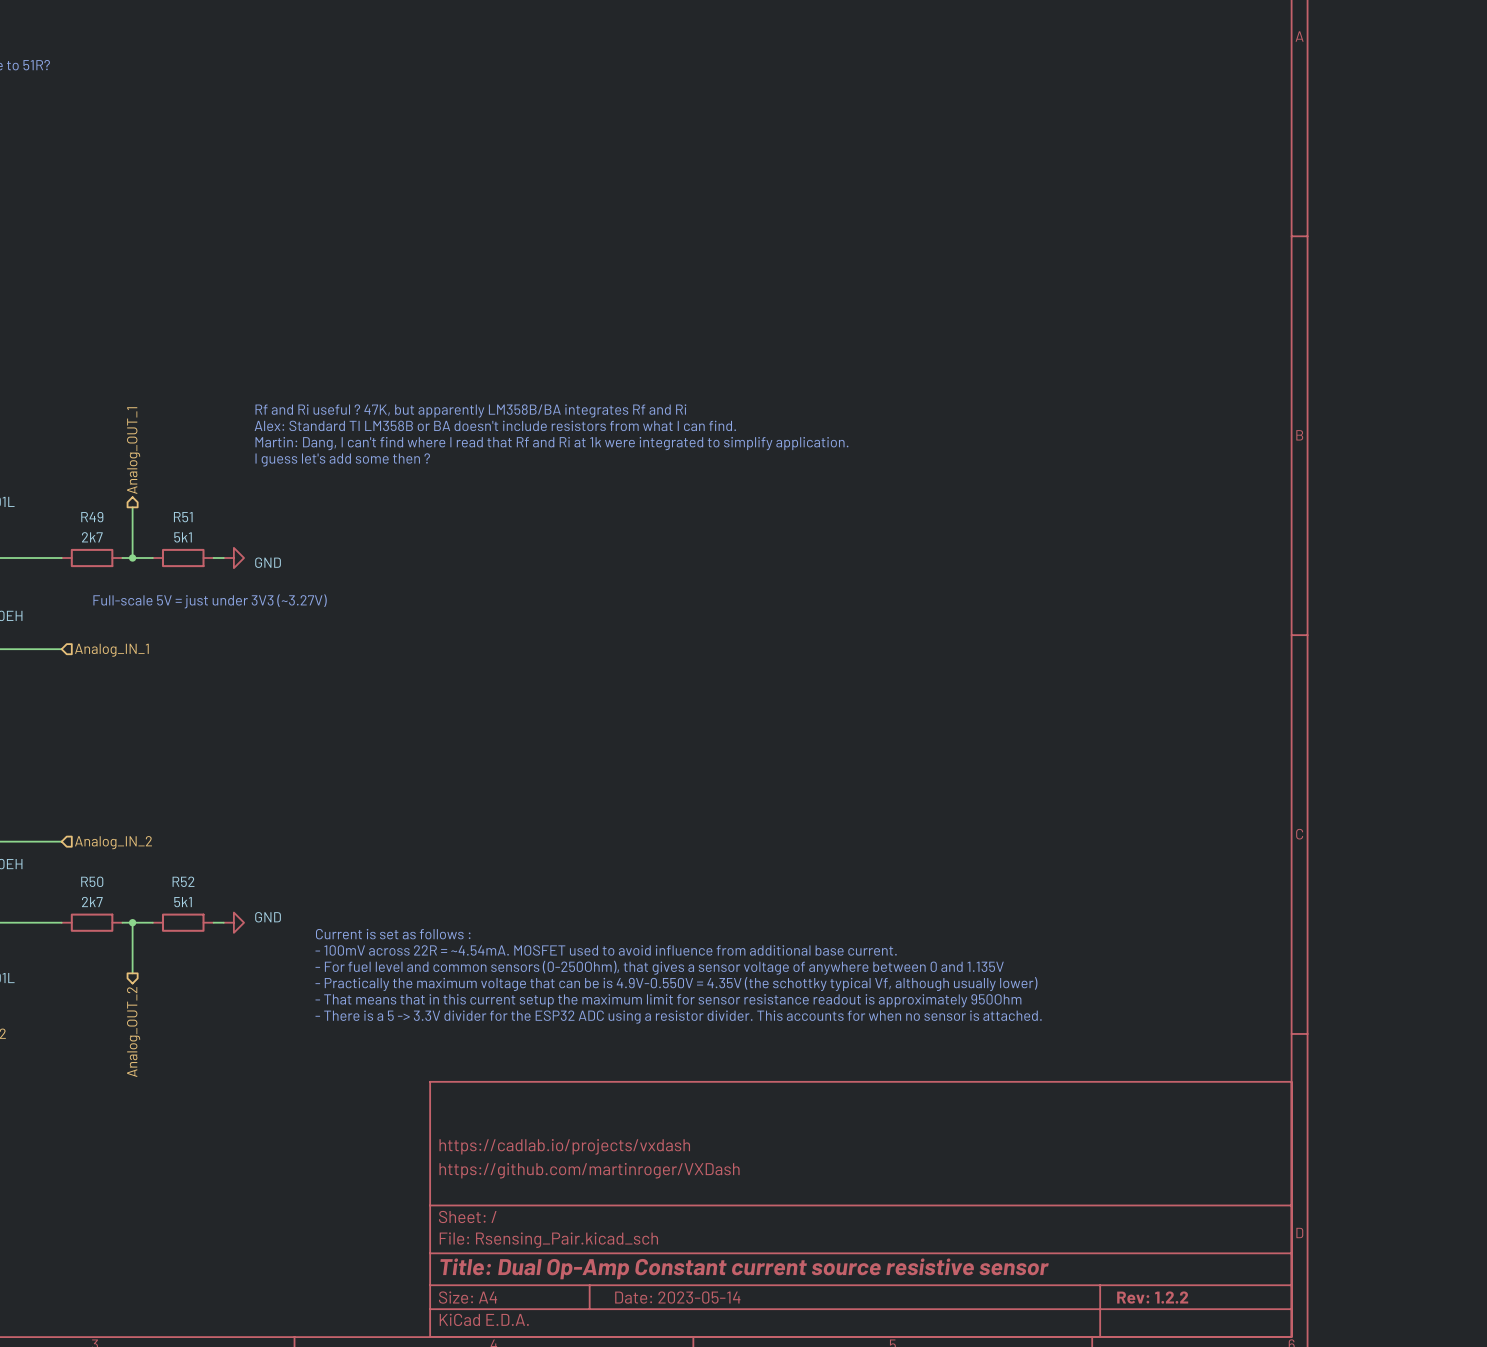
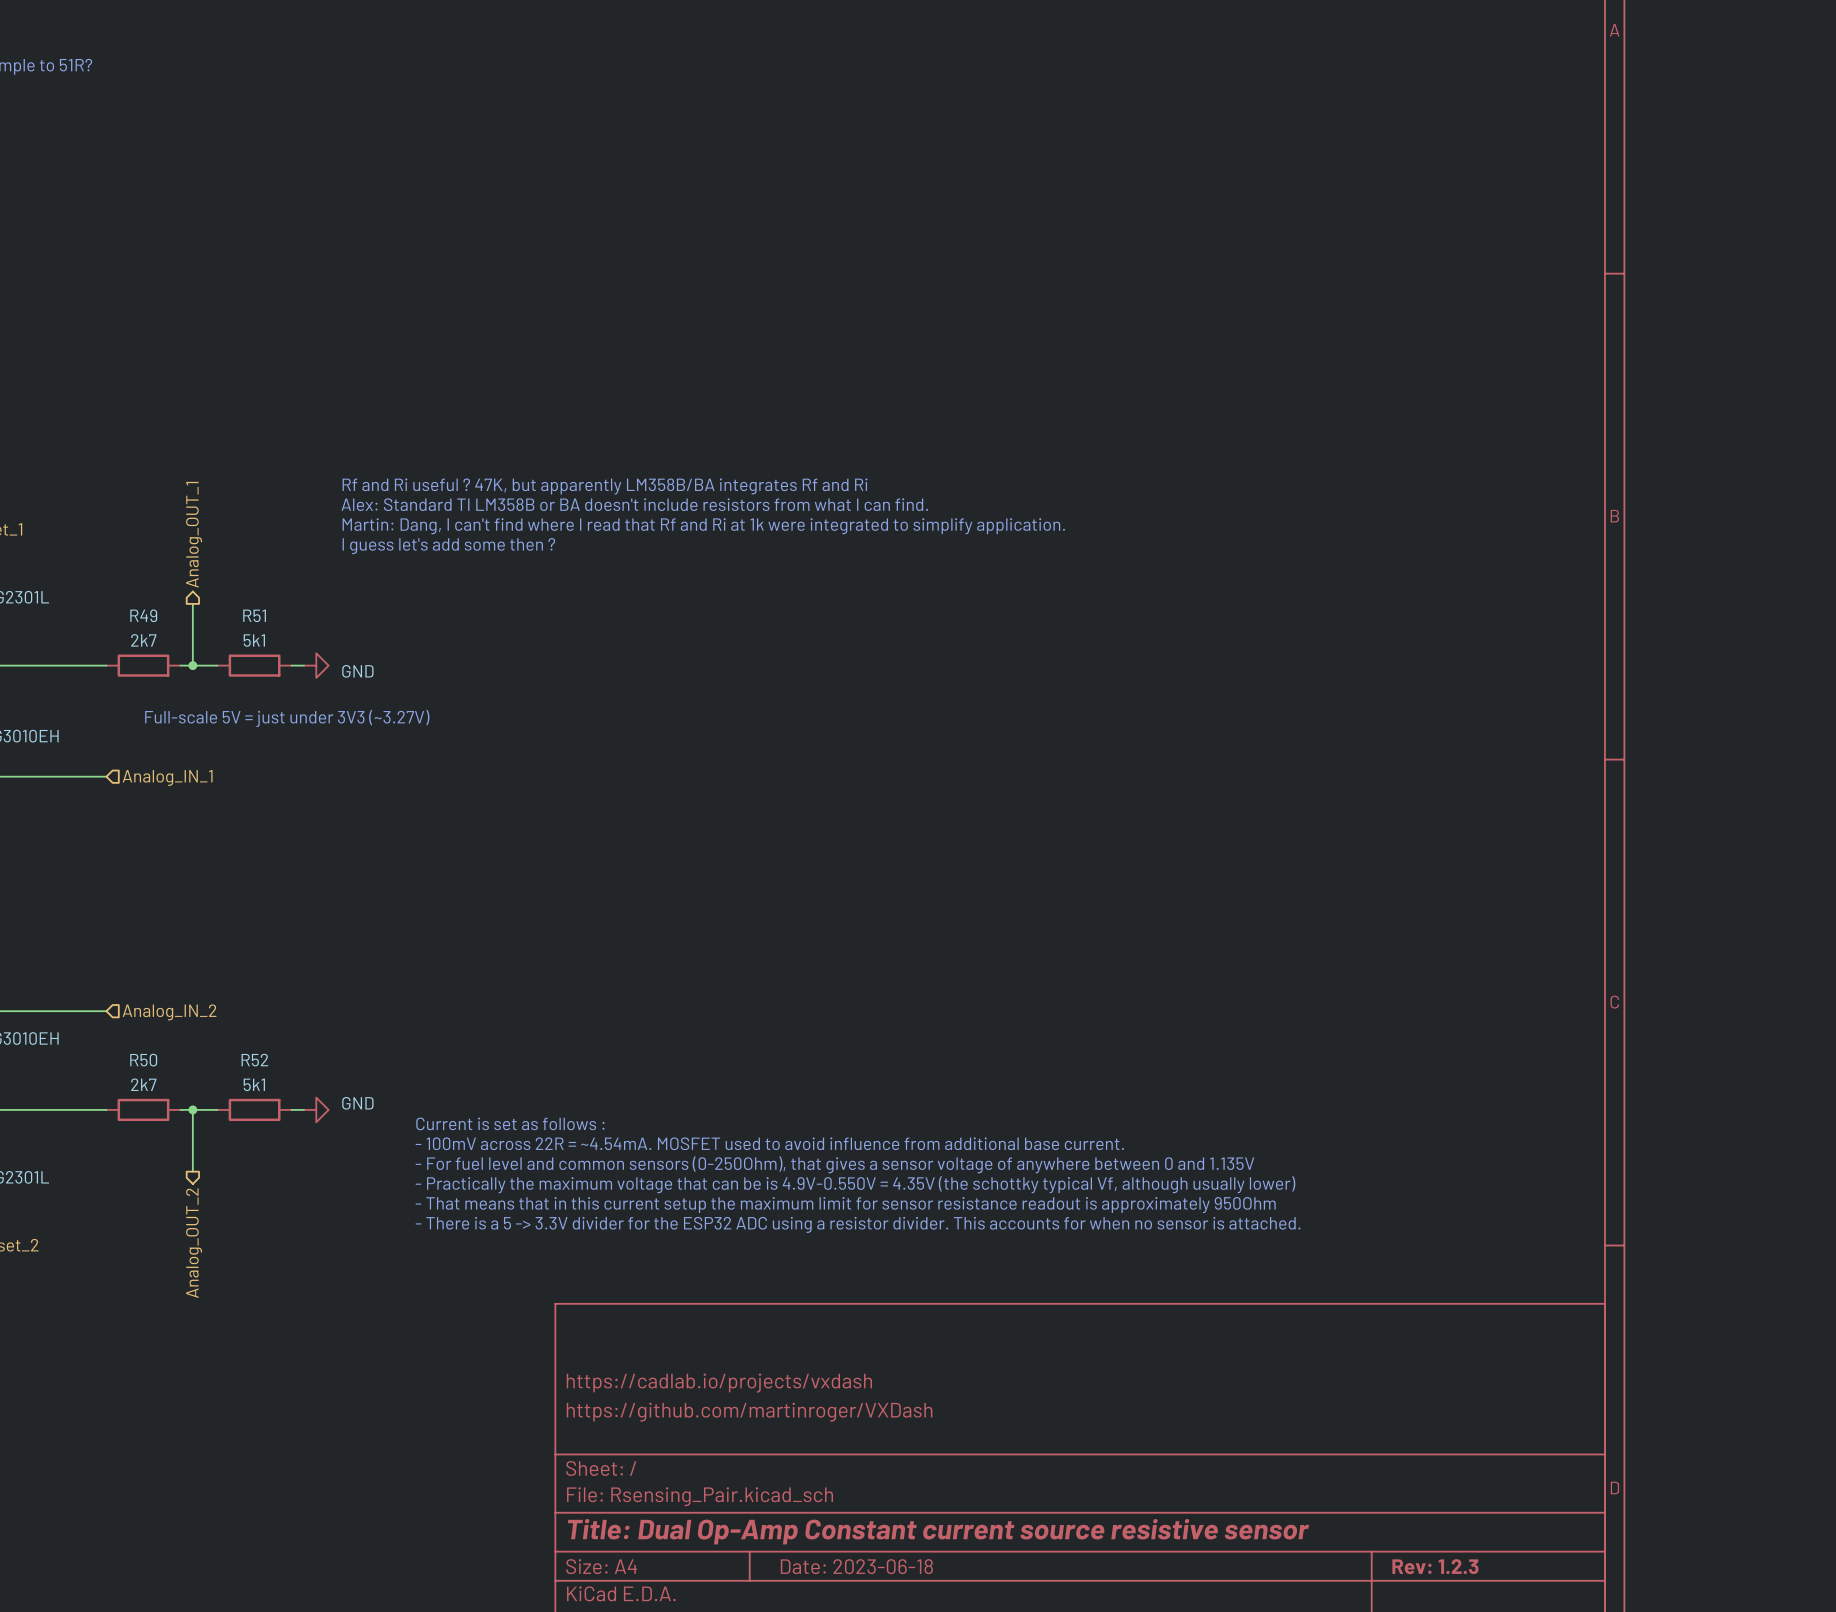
title block: Date: 2023-05-14 (677, 1297) -> Date: 2023-06-18 (856, 1566)
title block: Rev: 1.2.2 (1152, 1297) -> Rev: 1.2.3 (1435, 1566)

